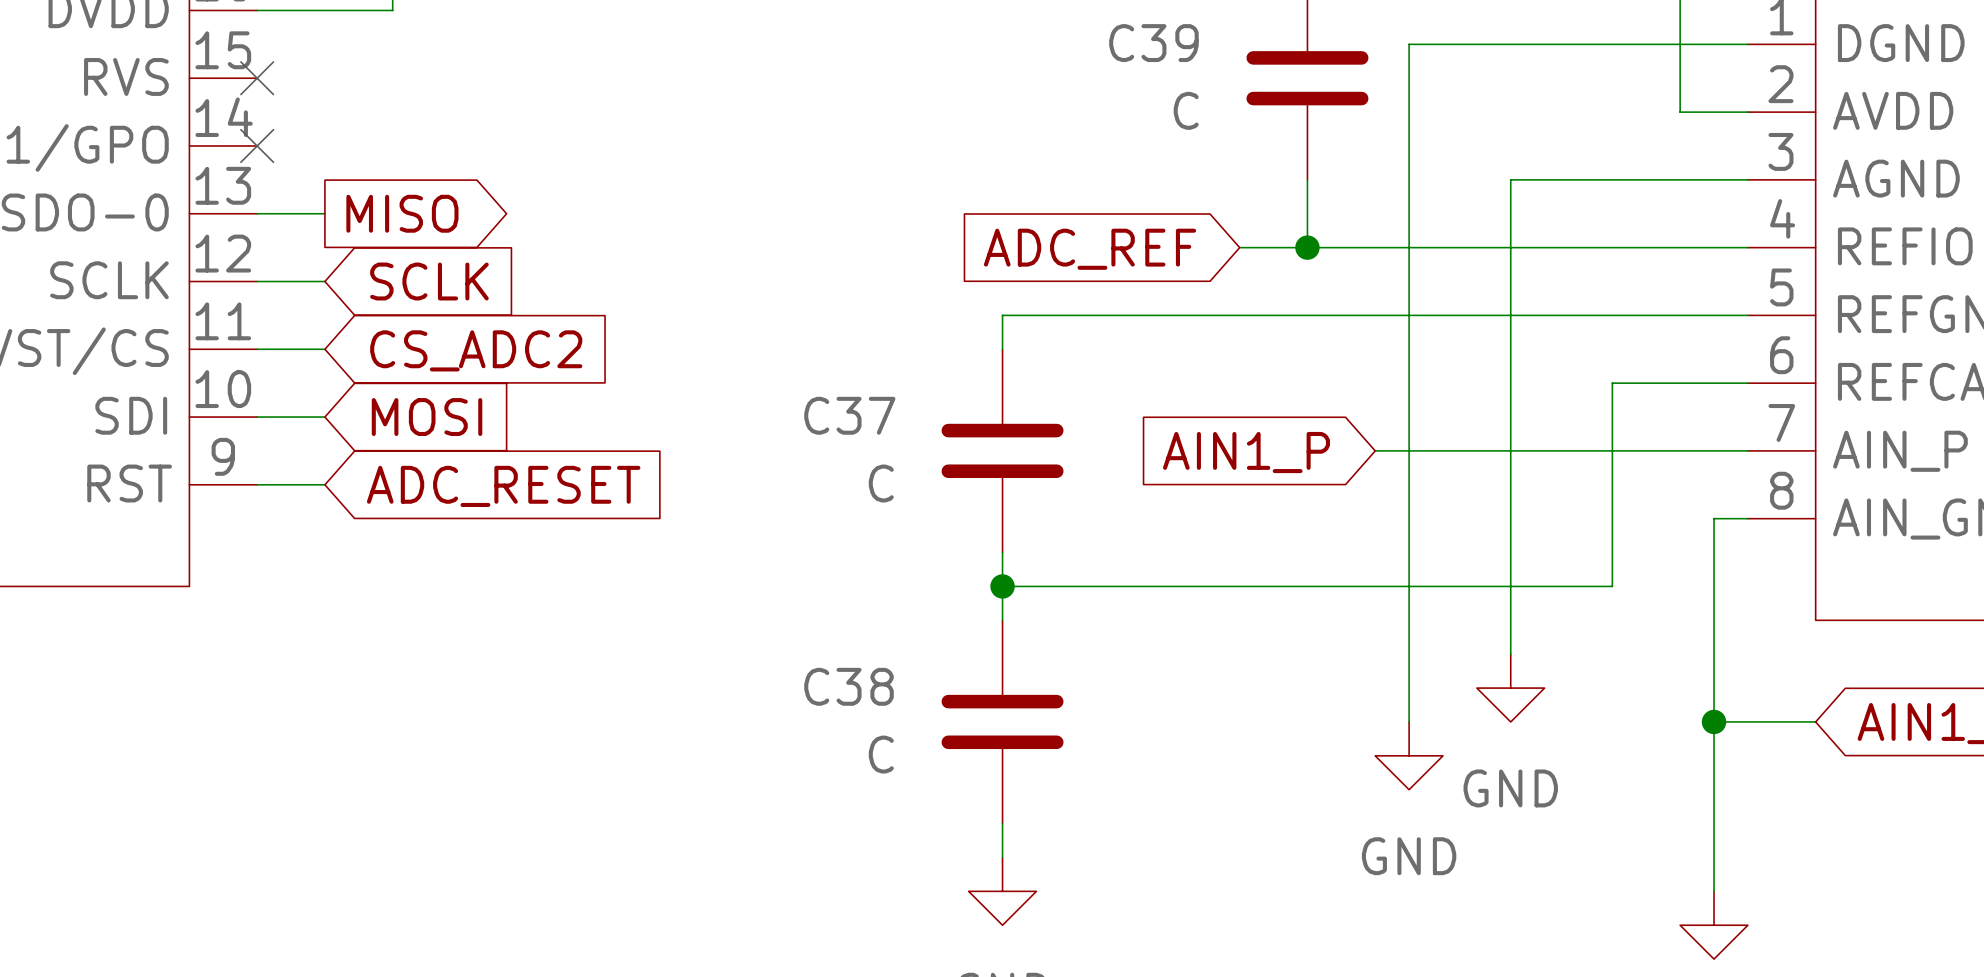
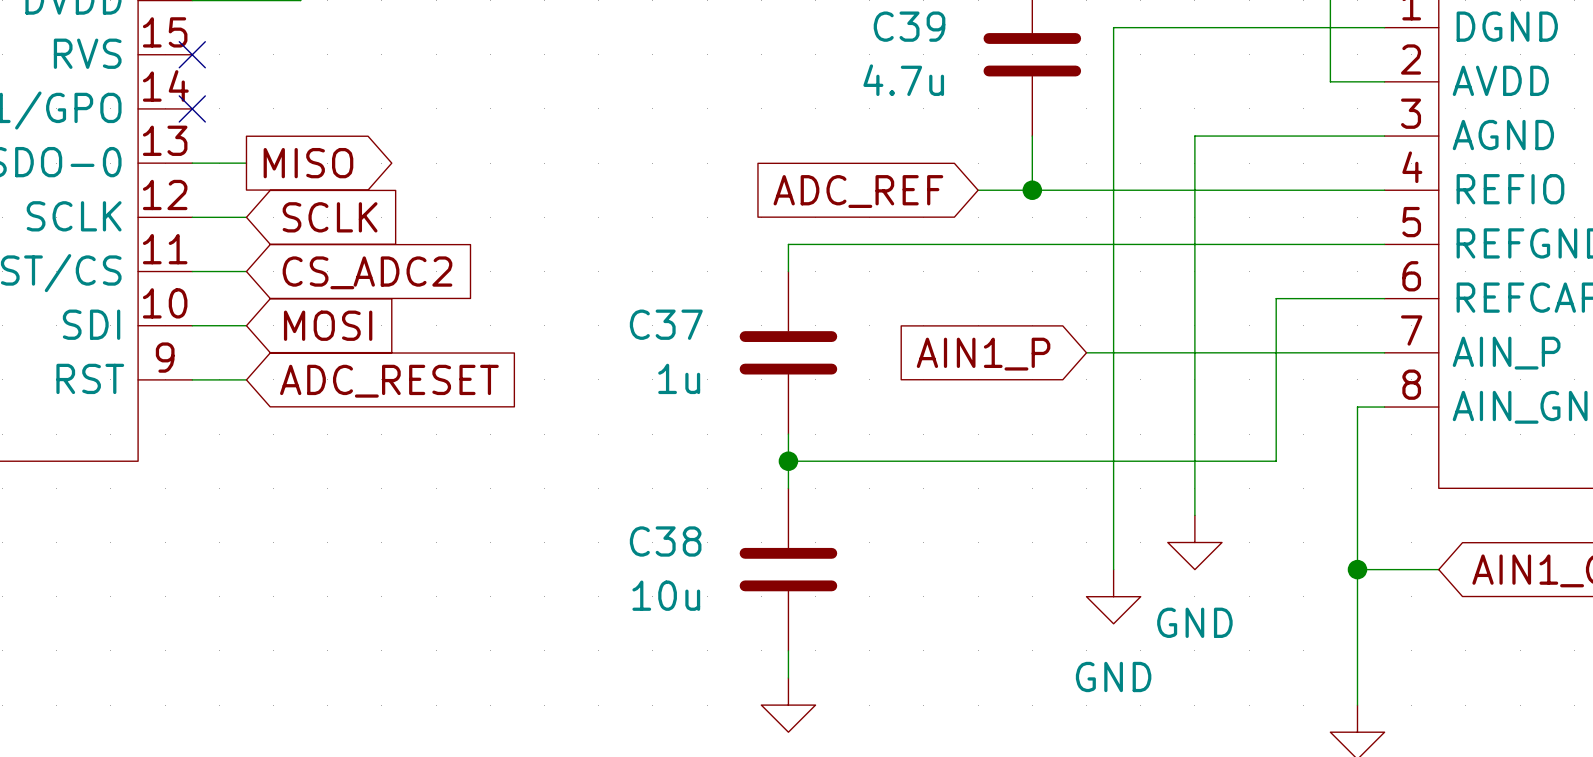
C39 value: C (1186, 110) -> 4.7u (903, 80)
C37 value: C (881, 483) -> 1u (679, 378)
C38 value: C (881, 754) -> 10u (666, 595)

